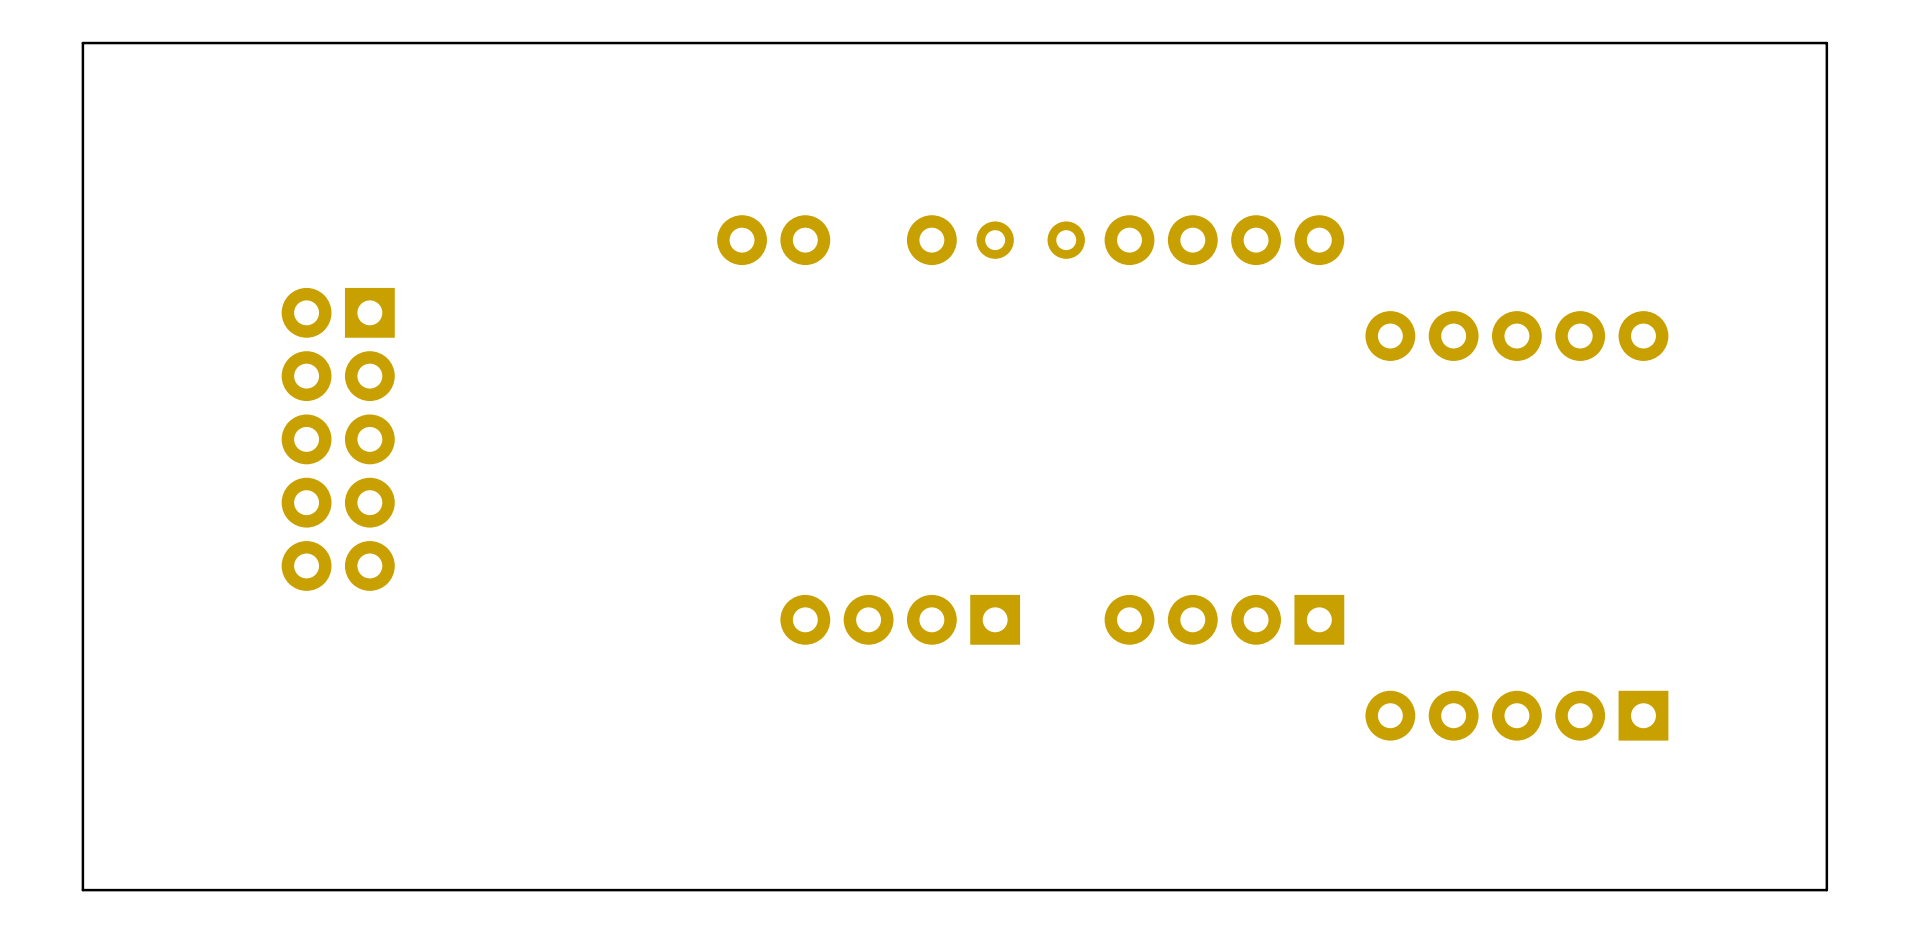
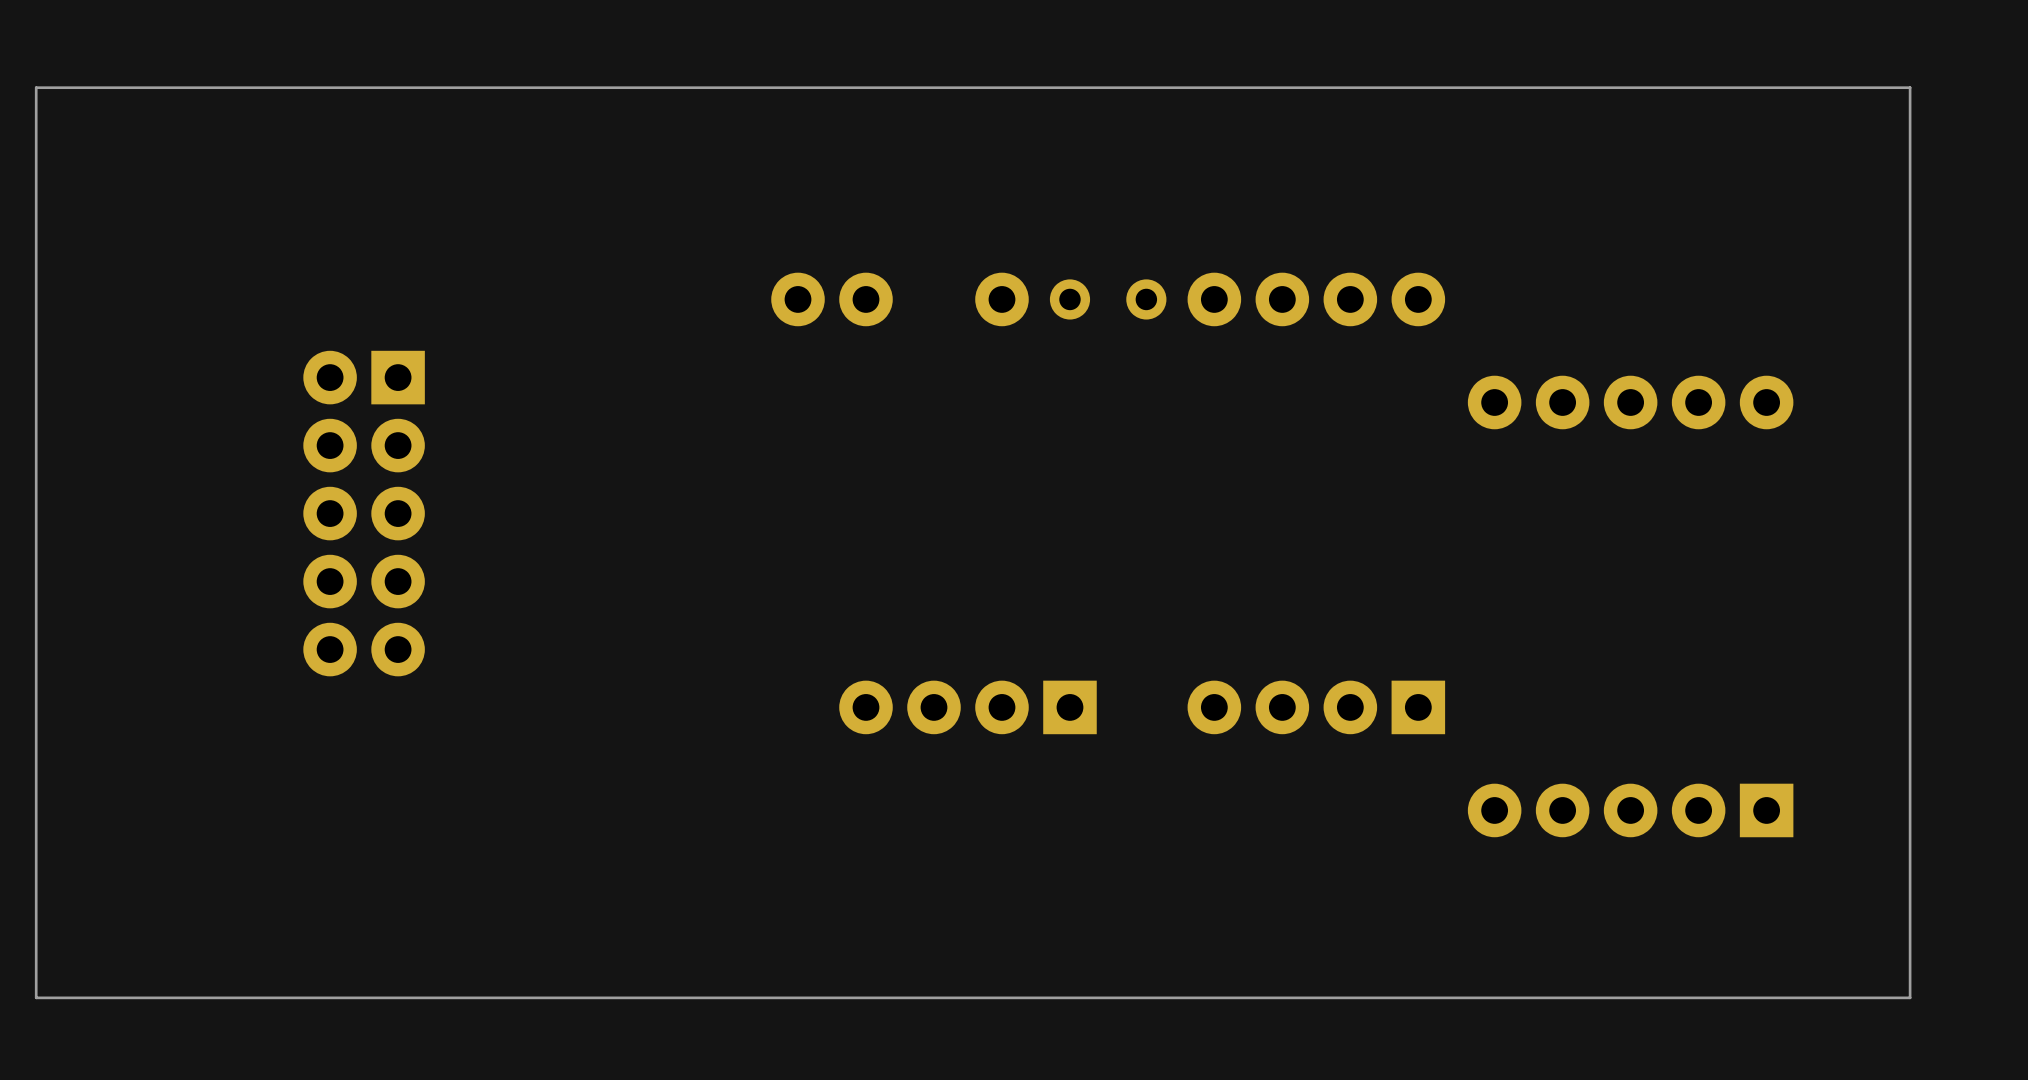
board edge: (82, 43) (82, 890) -> (89, 87) (36, 87) (36, 997) (89, 997)
board edge: (1777, 43) (1826, 43) (1826, 890) (1777, 890) -> (1910, 87) (1910, 997)

